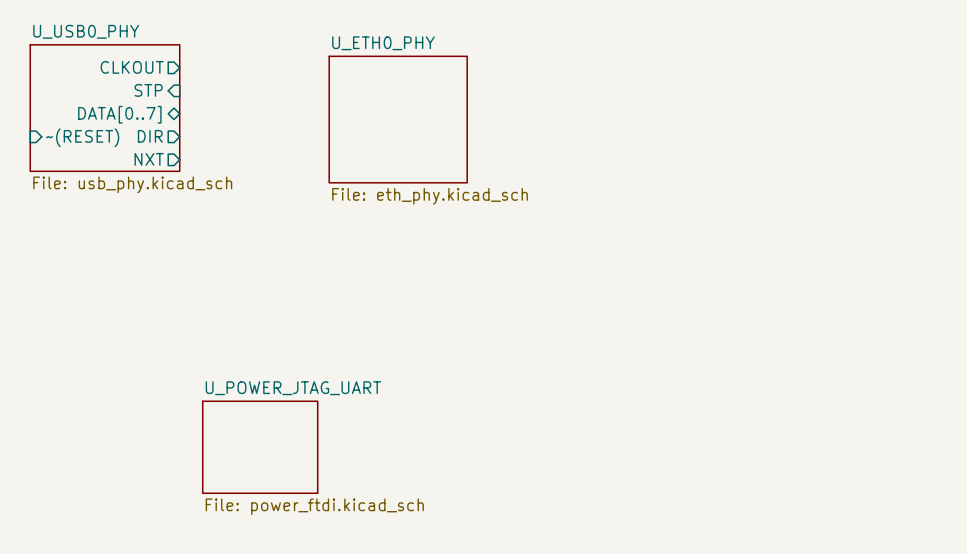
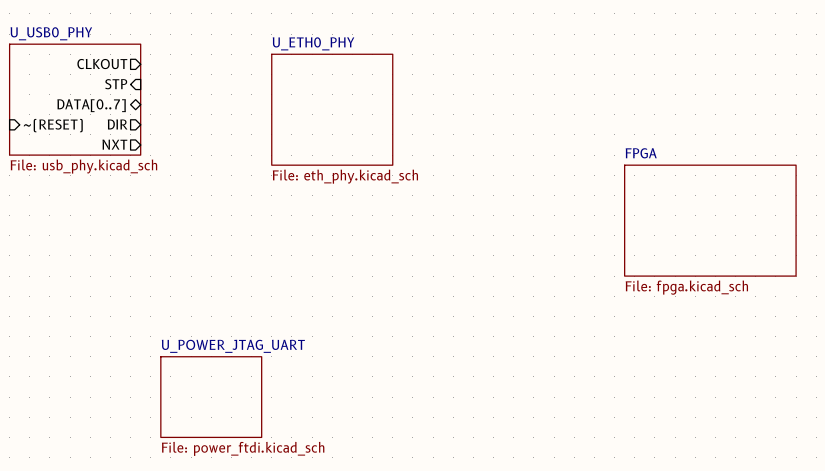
sheet FPGA: none -> File: fpga.kicad_sch (710, 220)

